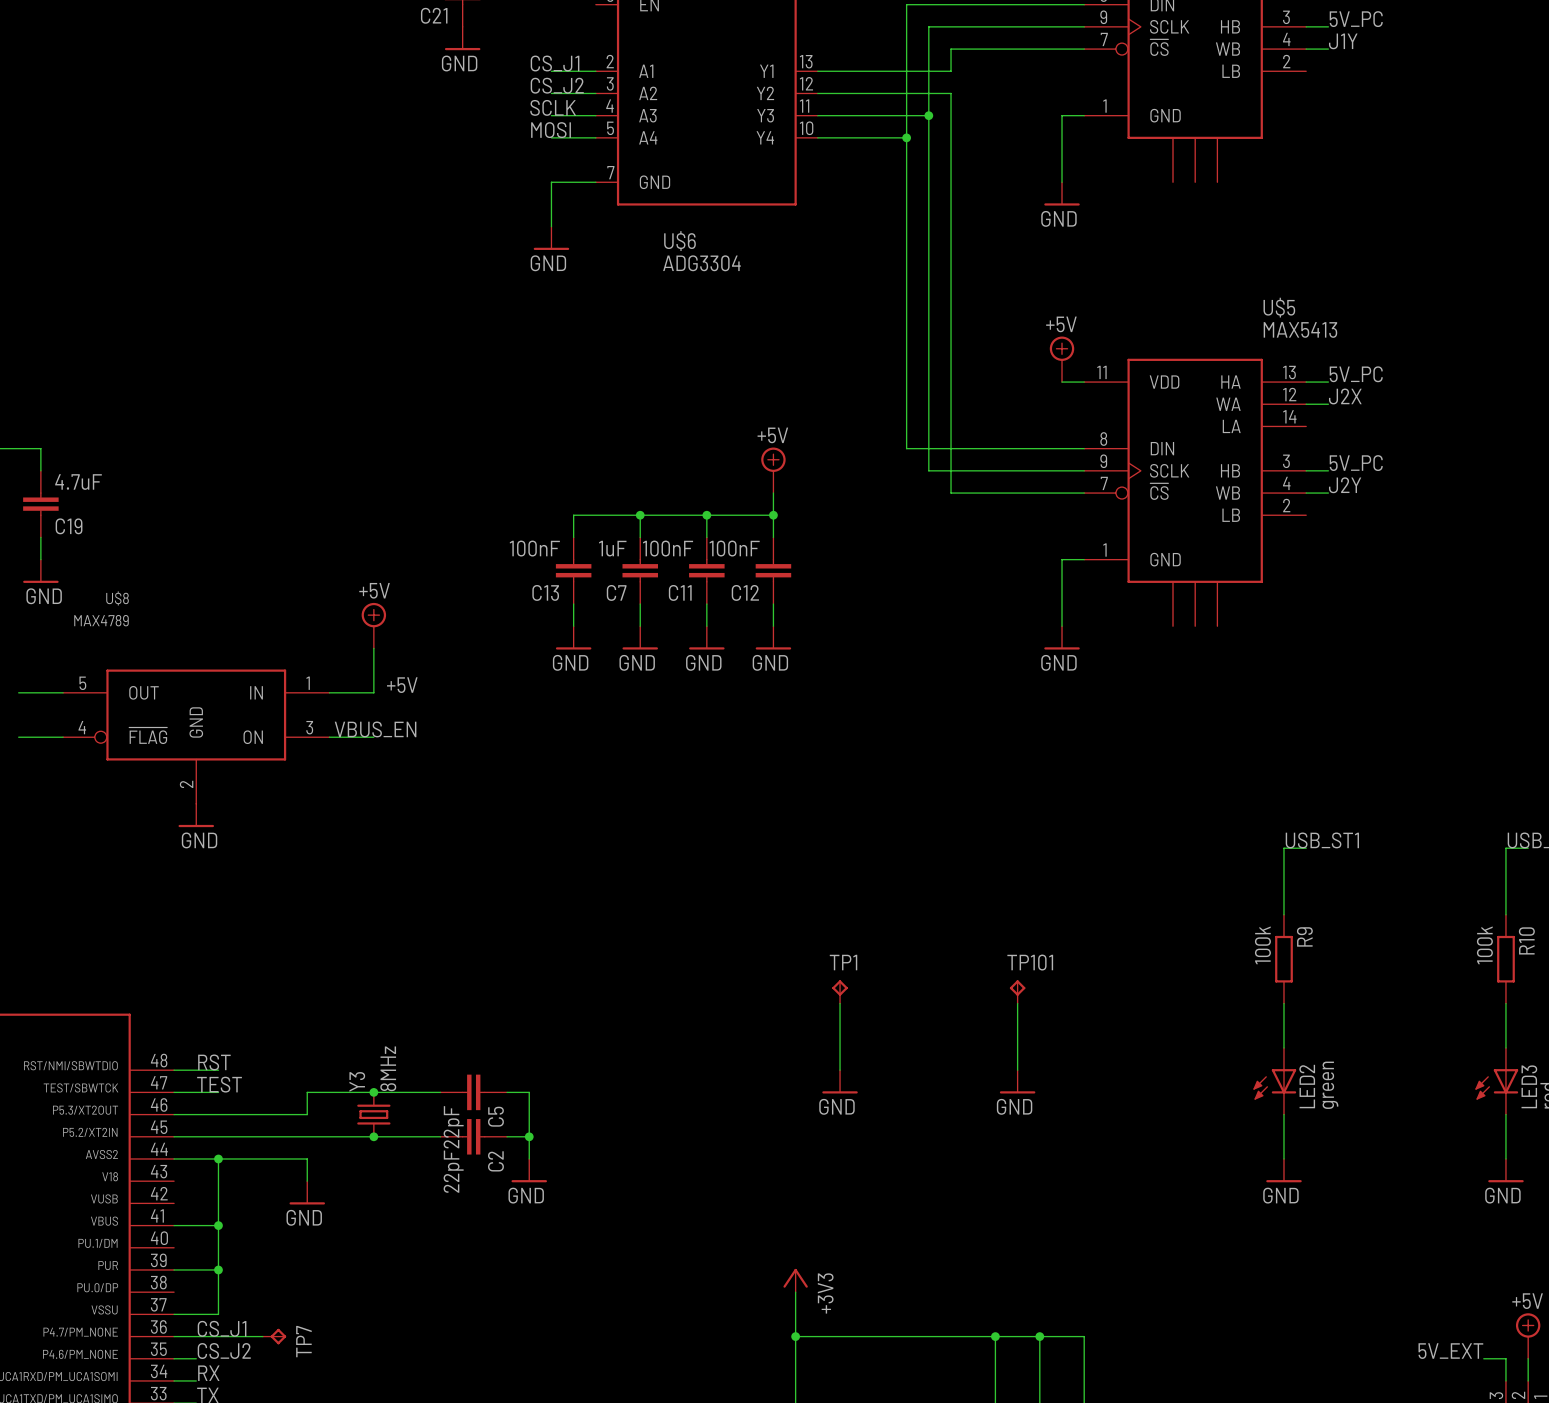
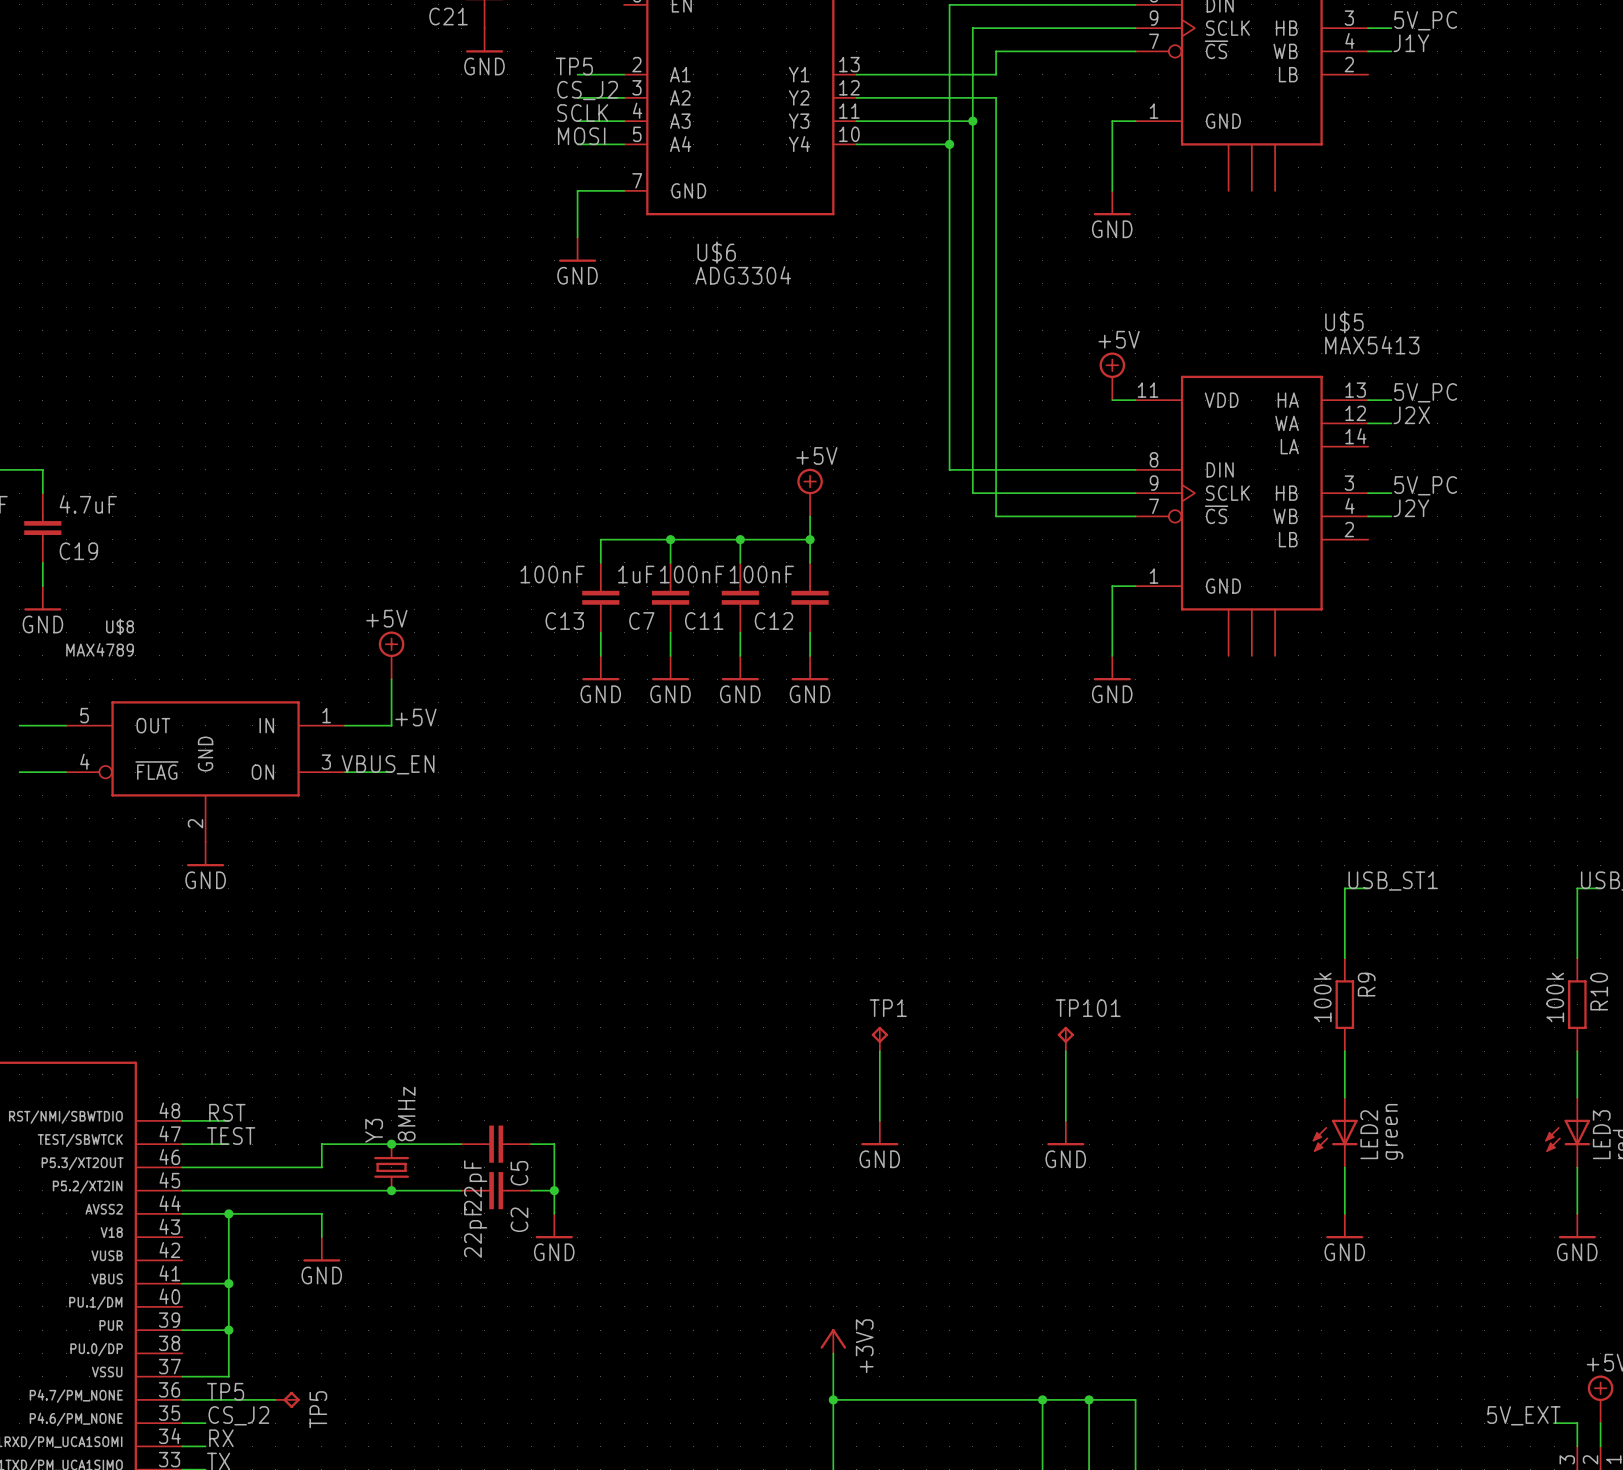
label: CS_J1 (555, 63) -> TP5 (574, 66)
label: CS_J1 (222, 1328) -> TP5 (225, 1391)
TP7 name: TP7 (303, 1341) -> TP5 (318, 1409)

